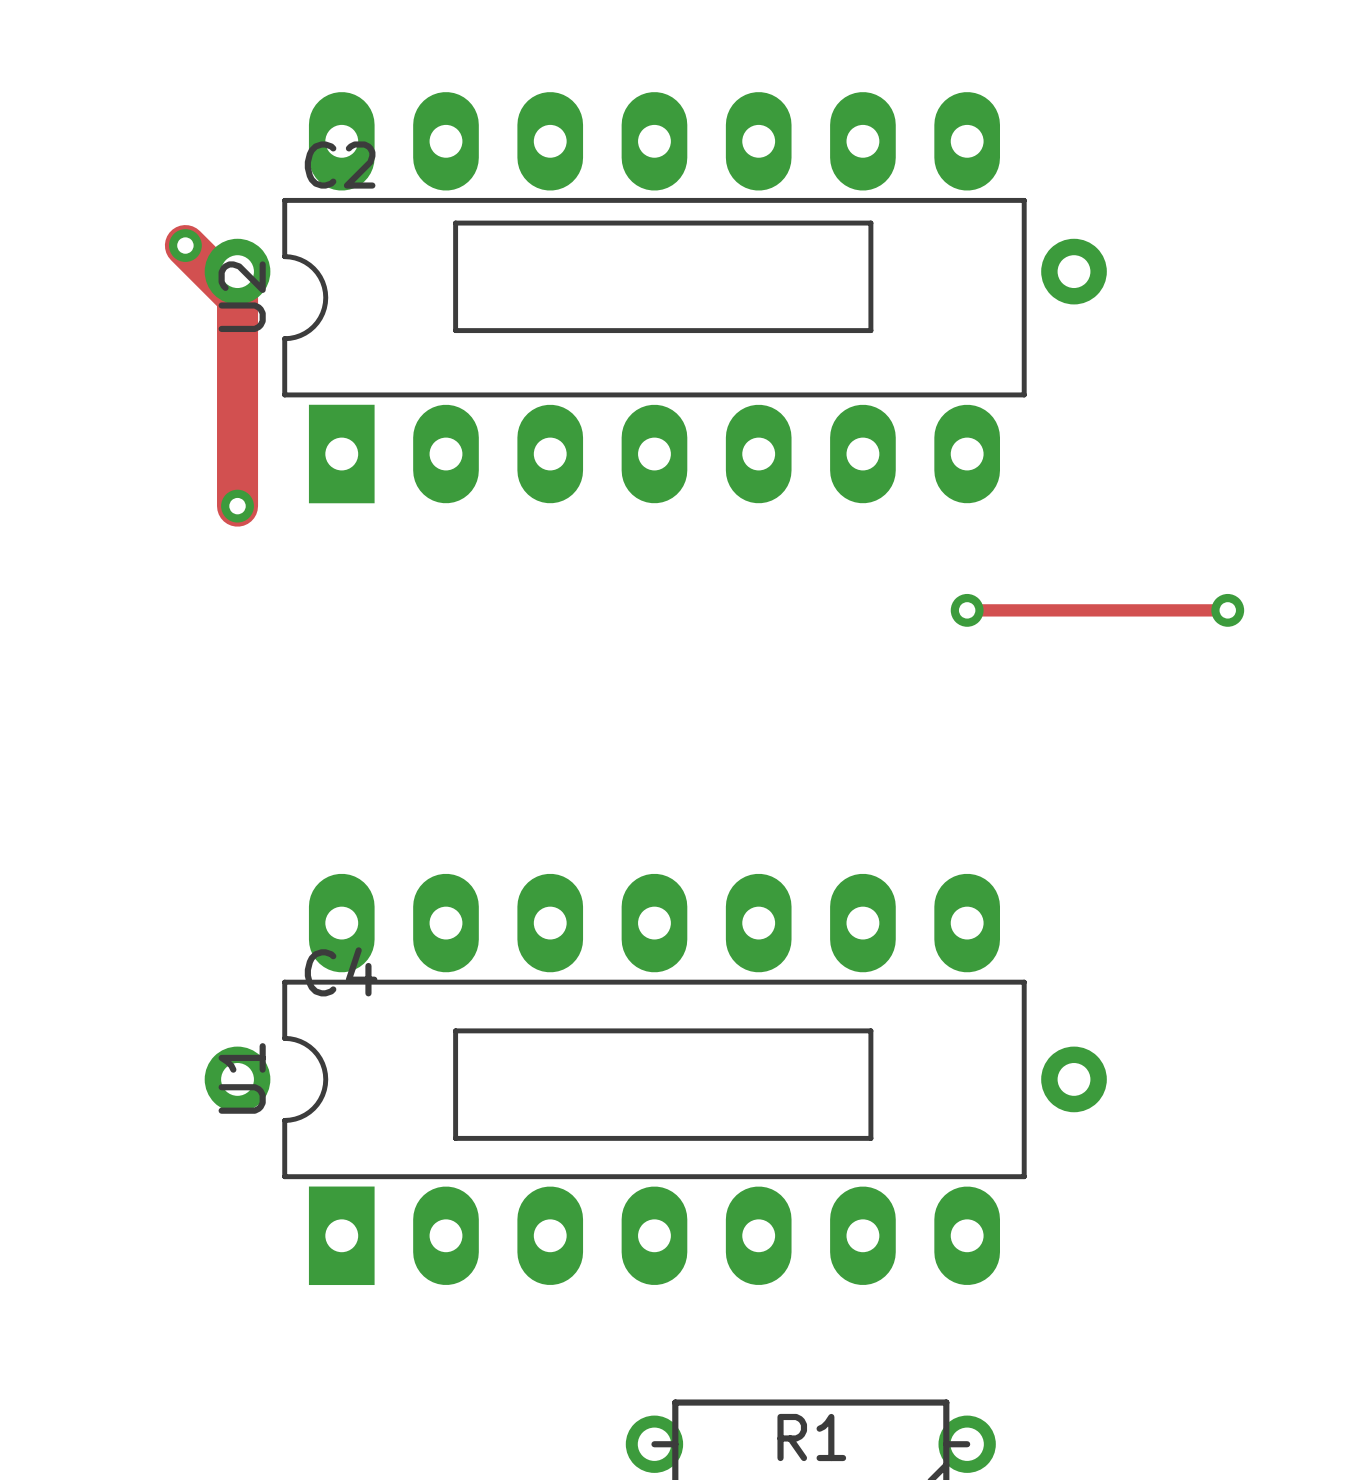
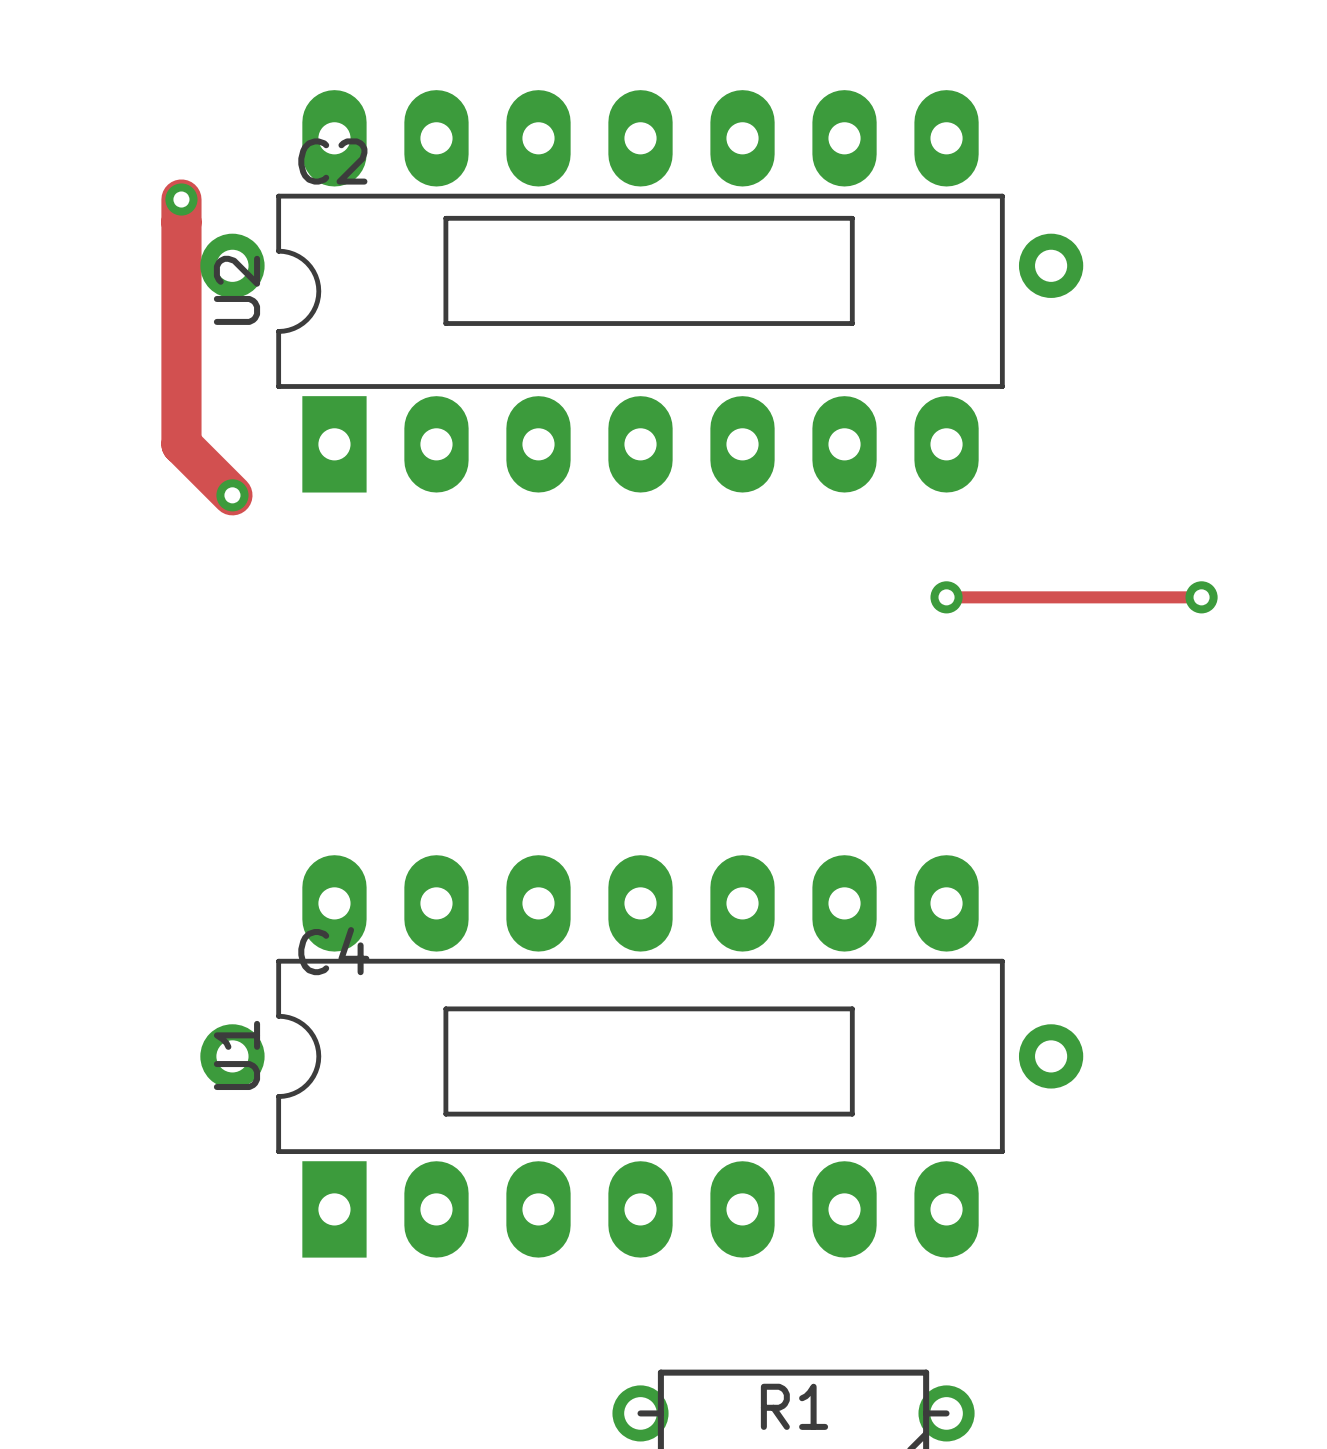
track: (185, 245) (237, 297) (237, 506) -> (181, 199) (181, 444) (232, 495)
via position: (185, 245) -> (181, 199)

